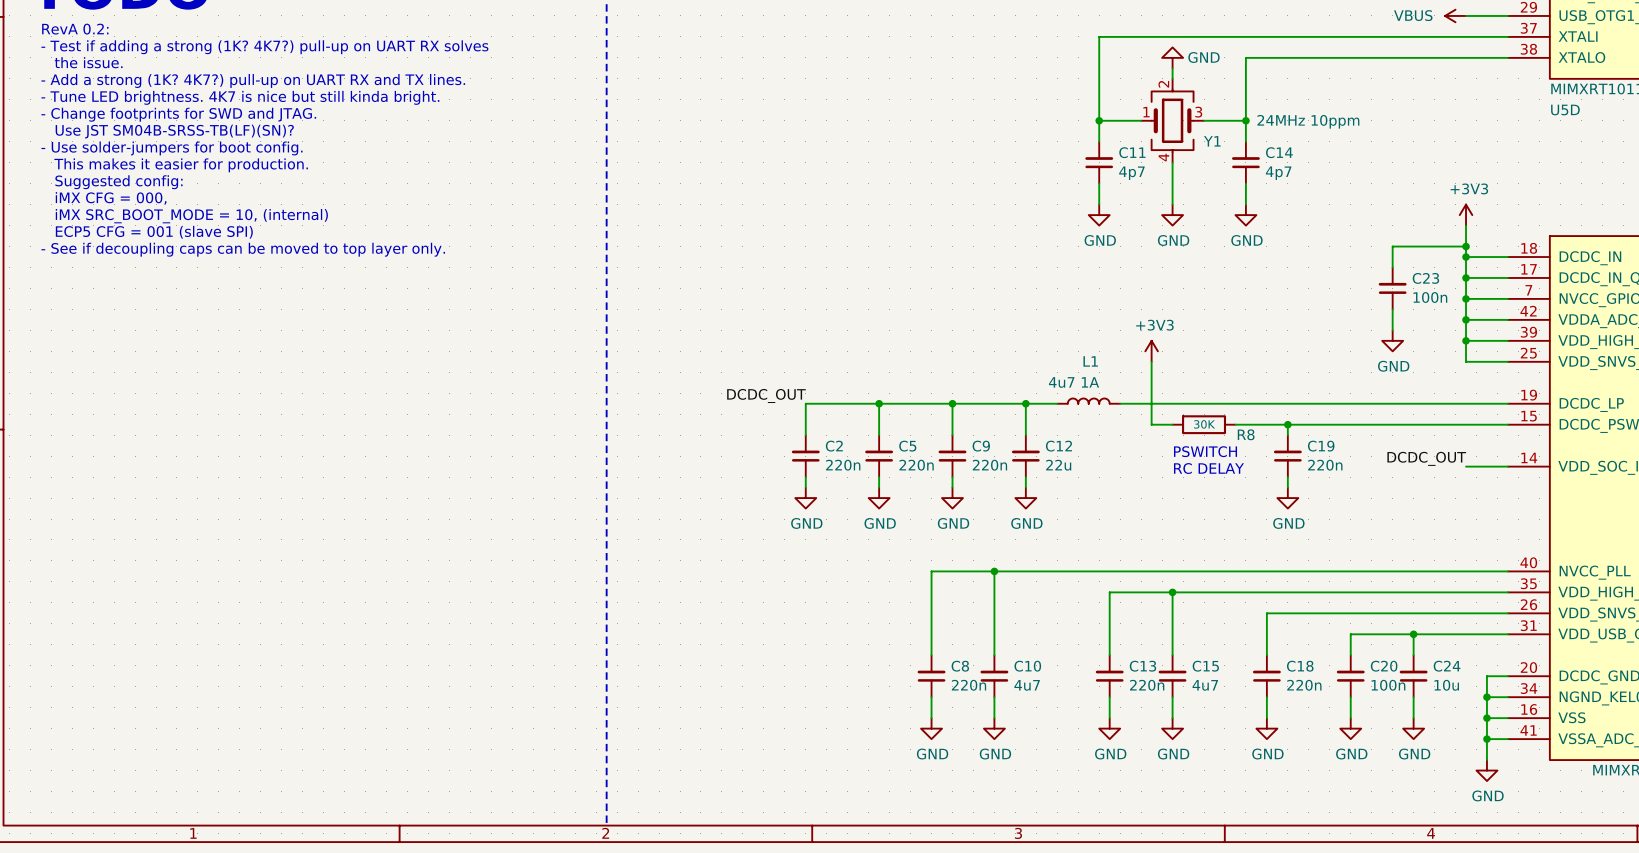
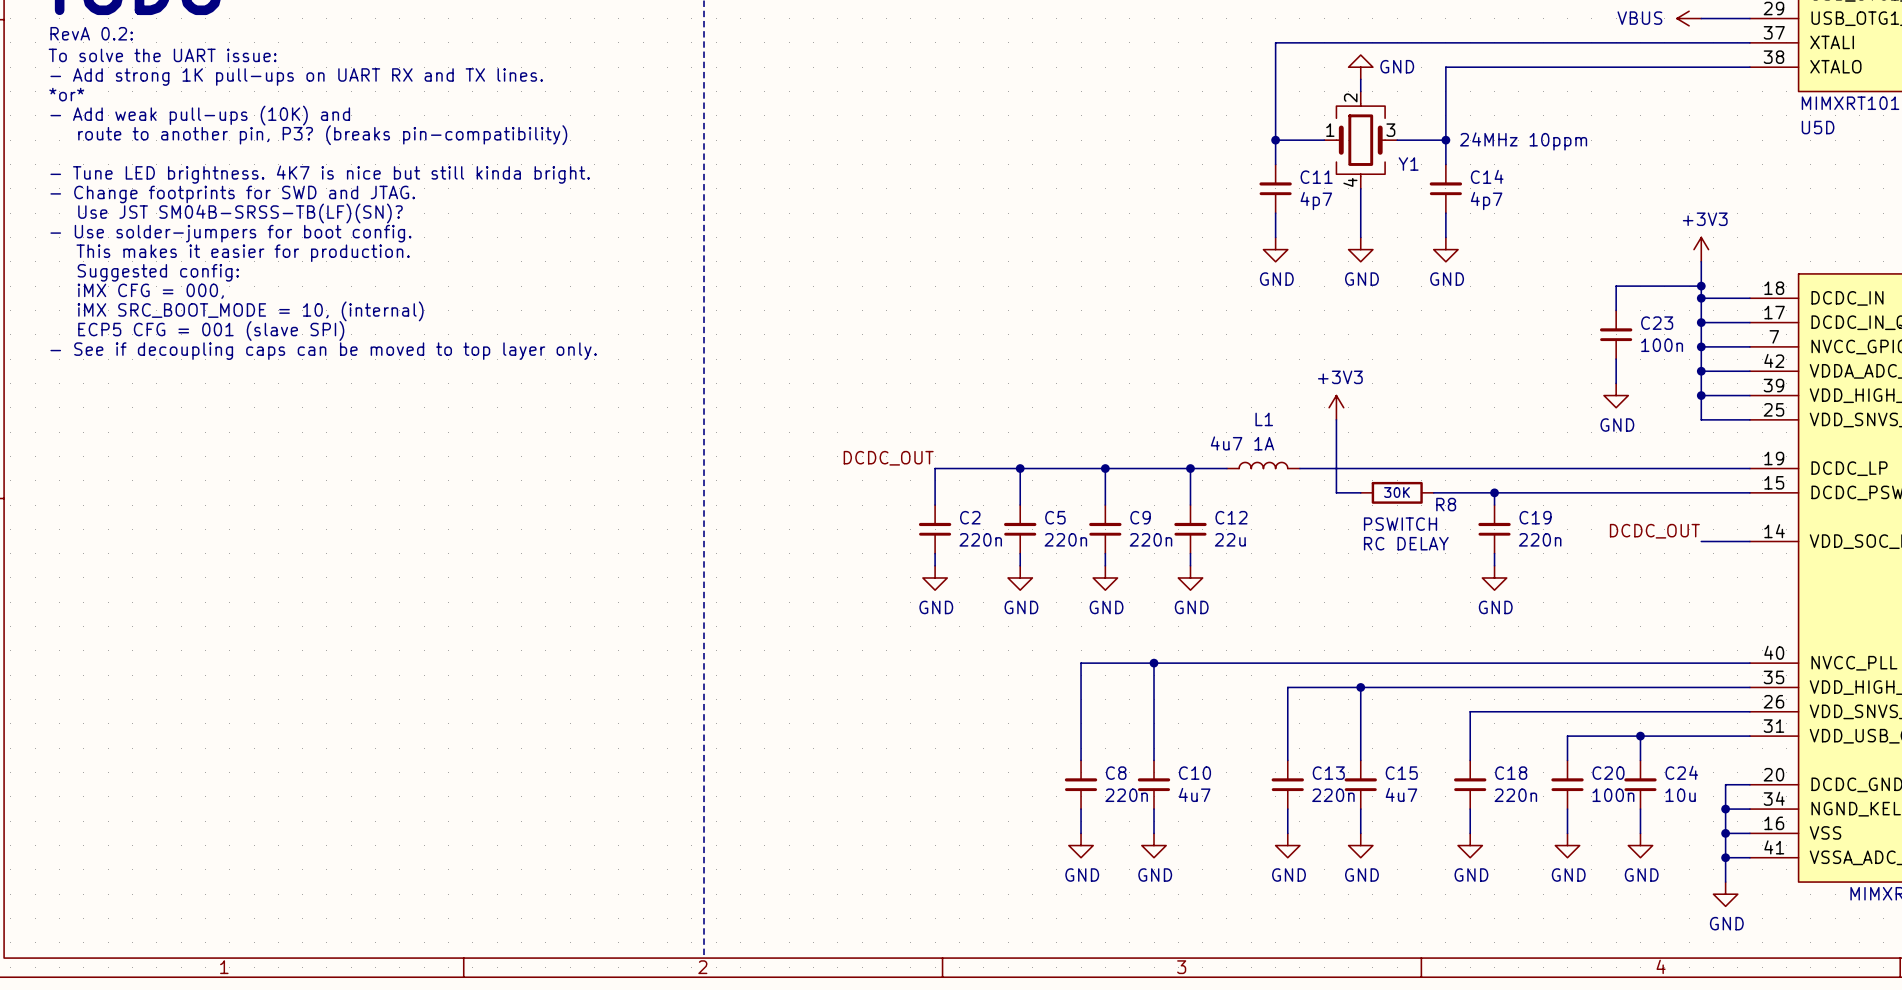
text: - Test if adding a strong (1K? 4K7?) pull-up on UART RX solves (264, 47) -> To solve the UART issue: (162, 55)
text: the issue. (88, 62) -> - Add strong 1K pull-ups on UART RX and TX lines. (296, 77)
text: - Add a strong (1K? 4K7?) pull-up on UART RX and TX lines. (253, 80) -> *or* (66, 94)
text position: - Tune LED brightness. 4K7 is nice but still kinda bright. (240, 97) -> - Tune LED brightness. 4K7 is nice but still kinda bright. (320, 174)
text: none -> - Add weak pull-ups (10K) and (200, 115)
text position: - Change footprints for SWD and JTAG. (178, 114) -> - Change footprints for SWD and JTAG. (232, 194)
text: none -> route to another pin, P3? (breaks pin-compatibility) (322, 135)
text position: Use JST SM04B-SRSS-TB(LF)(SN)? (174, 131) -> Use JST SM04B-SRSS-TB(LF)(SN)? (240, 213)
text position: - Use solder-jumpers for boot config. (171, 148) -> - Use solder-jumpers for boot config. (230, 233)
text position: This makes it easier for production. (181, 165) -> This makes it easier for production. (243, 253)
text position: Suggested config: (118, 182) -> Suggested config: (158, 272)
text position: iMX CFG = 000, (111, 198) -> iMX CFG = 000, (150, 291)
text position: iMX SRC_BOOT_MODE = 10, (internal) (191, 216) -> iMX SRC_BOOT_MODE = 10, (internal) (250, 311)
text position: ECP5 CFG = 001 (slave SPI) (154, 232) -> ECP5 CFG = 001 (slave SPI) (211, 330)
text position: - See if decoupling caps can be moved to top layer only. (243, 249) -> - See if decoupling caps can be moved to top layer only. (323, 351)

